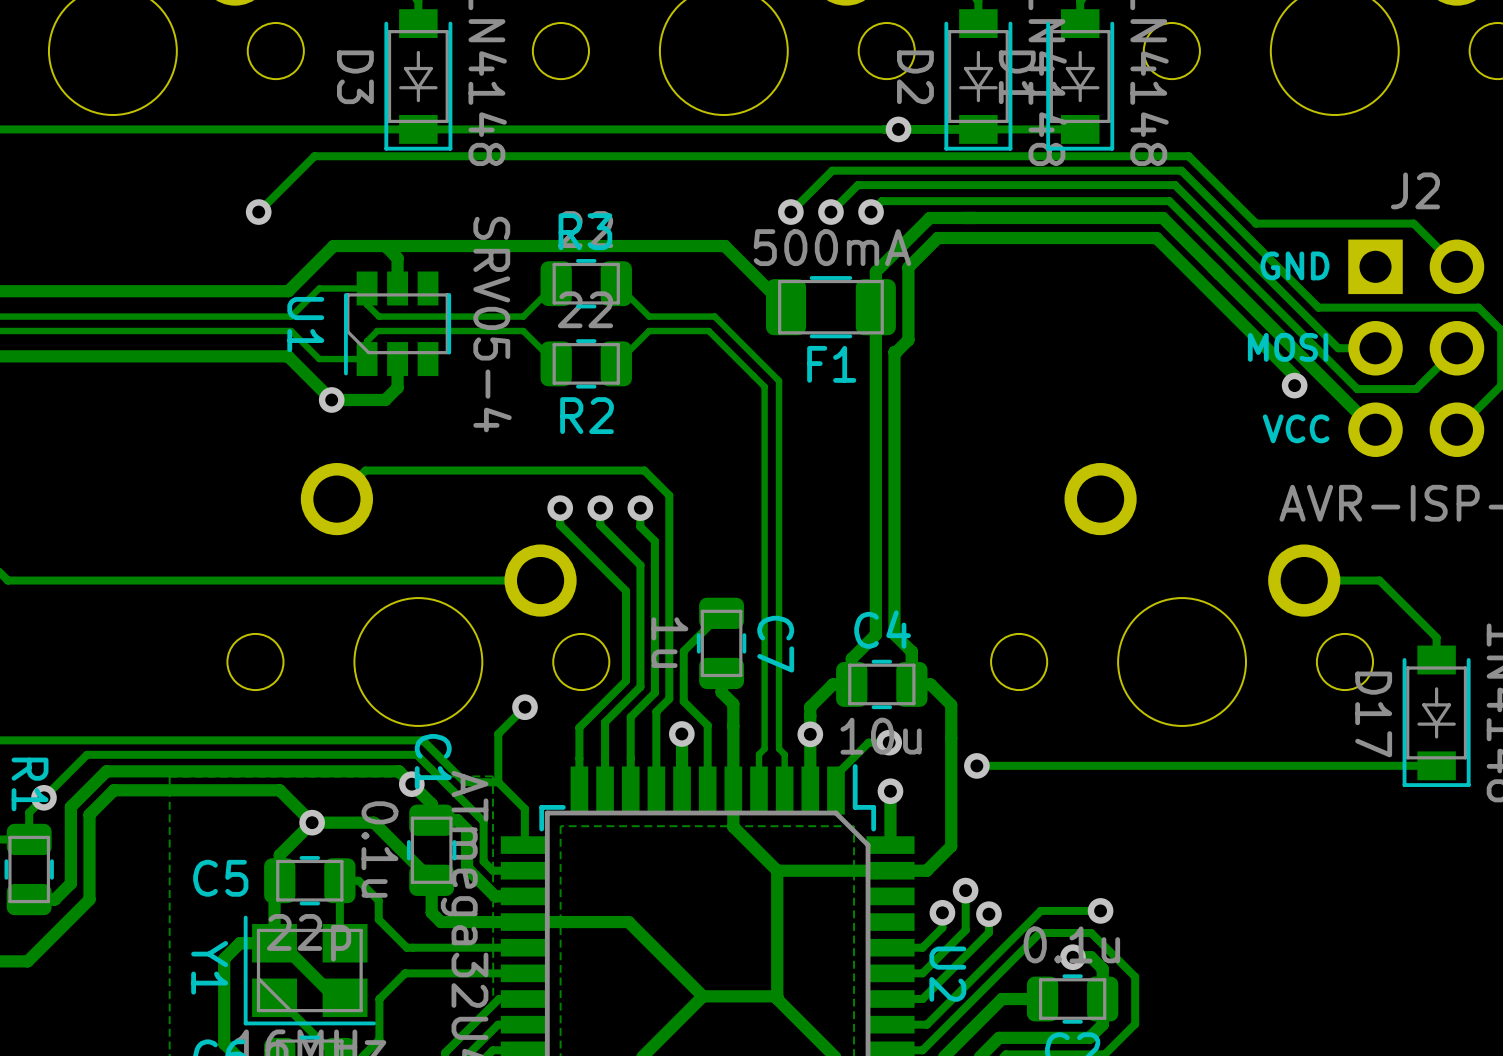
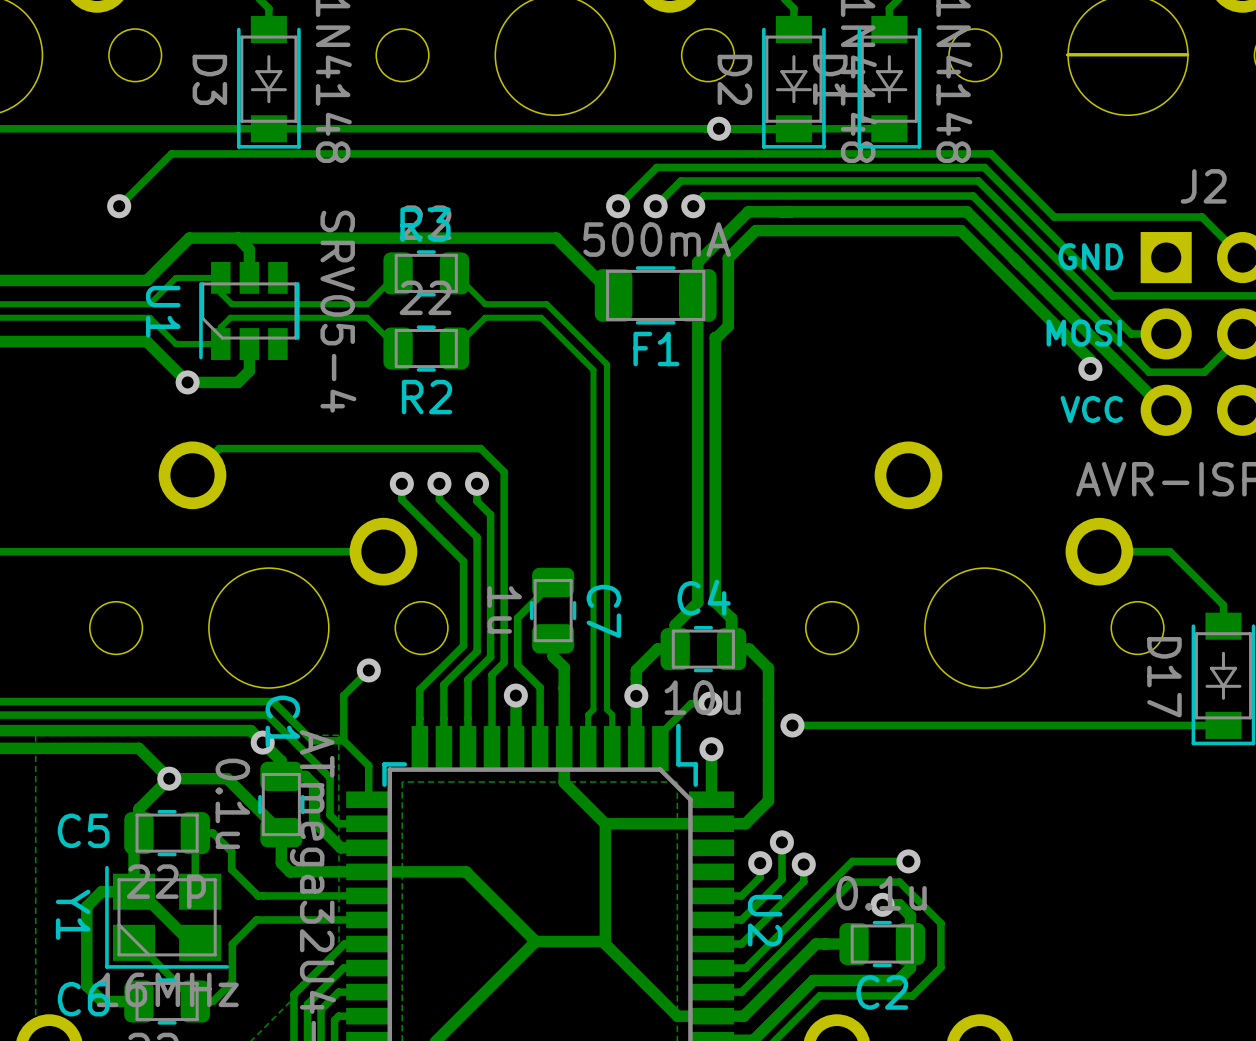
board edge: none -> (1067, 54) (1187, 54) (1067, 54)

